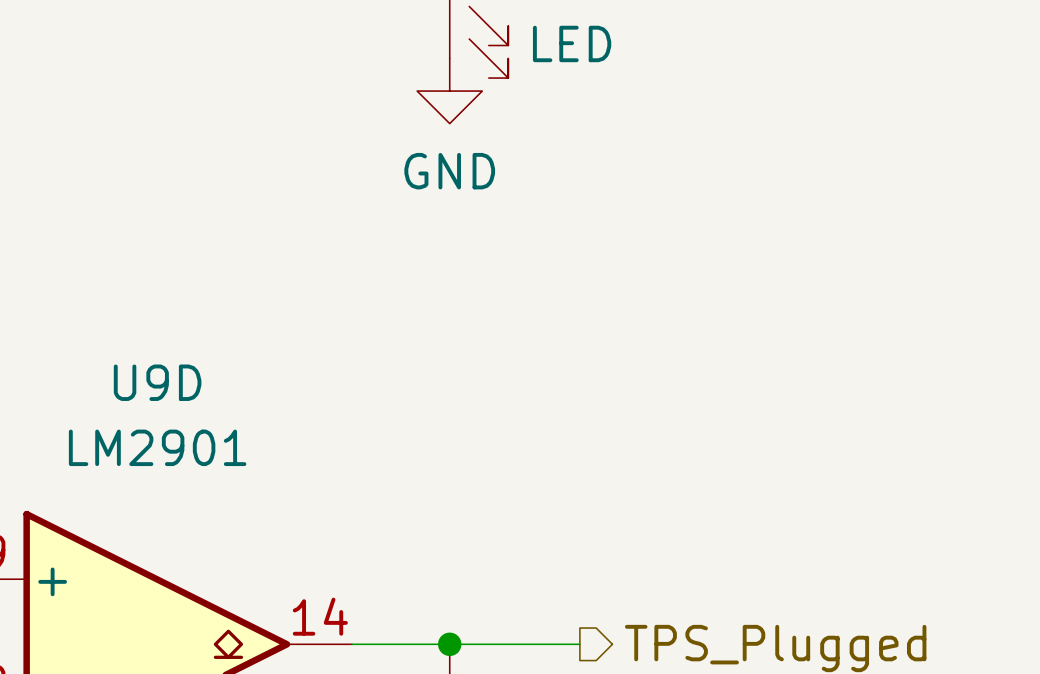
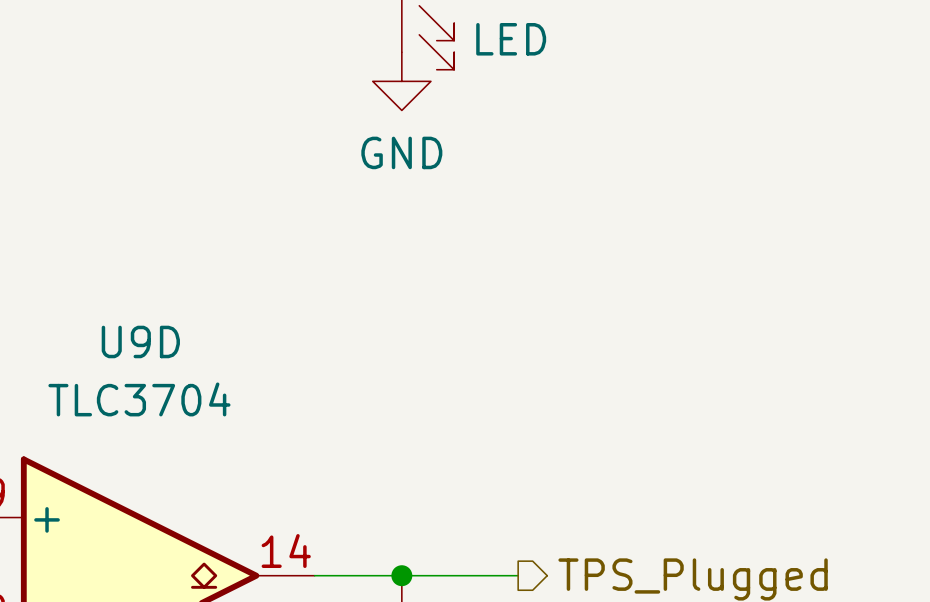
U9D value: LM2901 (157, 447) -> TLC3704 (139, 399)

